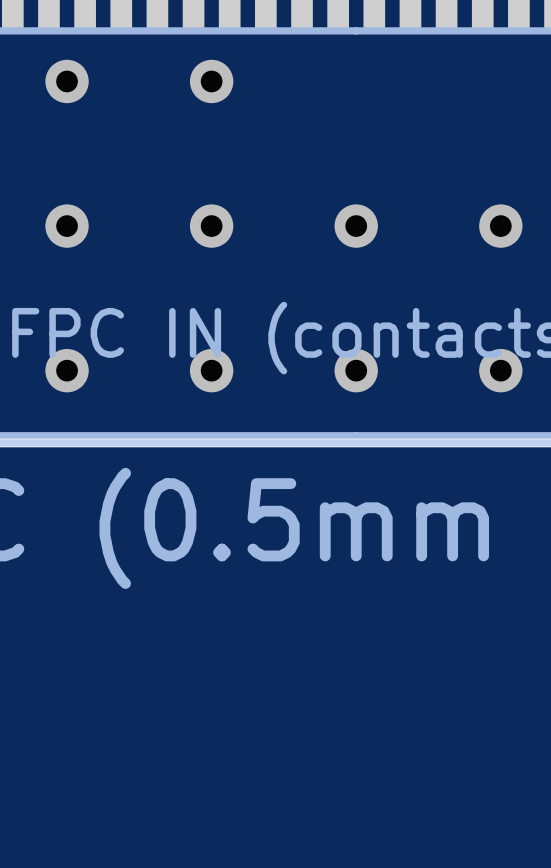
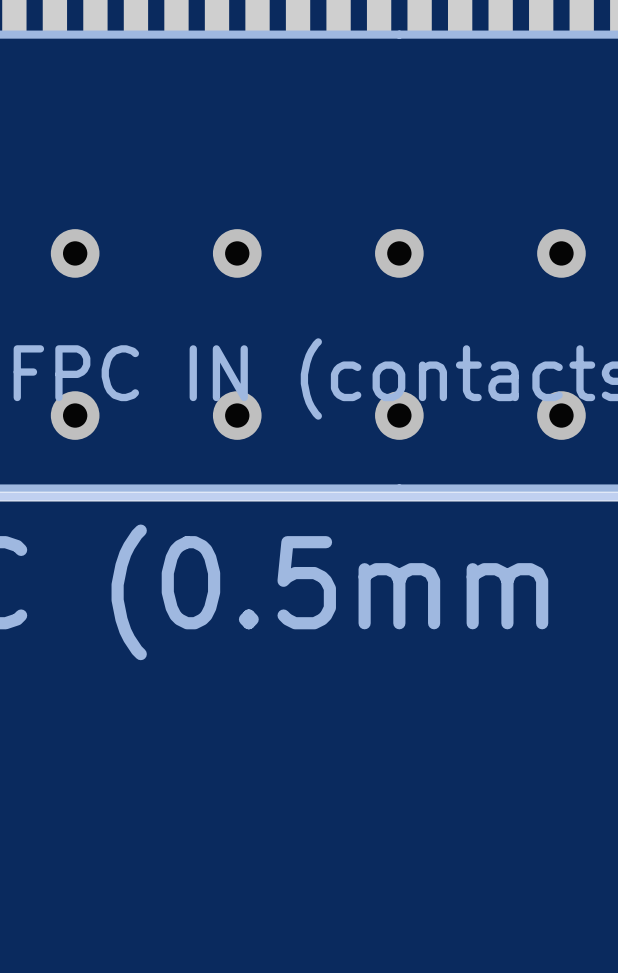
via: (67, 81) -> none
via: (211, 81) -> none

